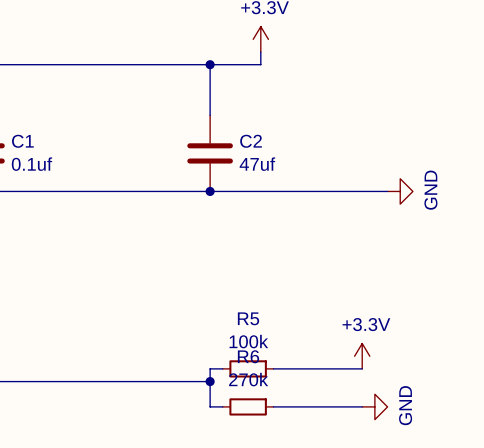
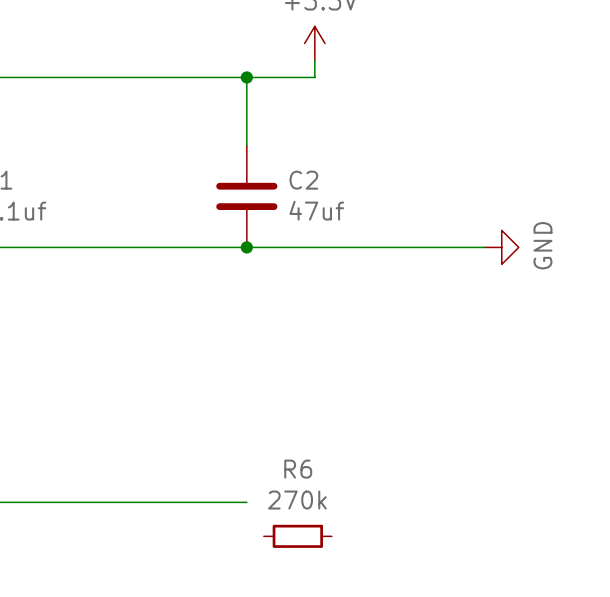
power symbol: +3.3V (362, 356) -> none
wire: (222, 368) (210, 368) (210, 406) (222, 406) -> none
R5: 100k (248, 368) -> none
wire: (273, 368) (362, 368) -> none
junction: (210, 381) -> none
wire: (273, 406) (362, 406) -> none
power symbol: GND (374, 406) -> none

